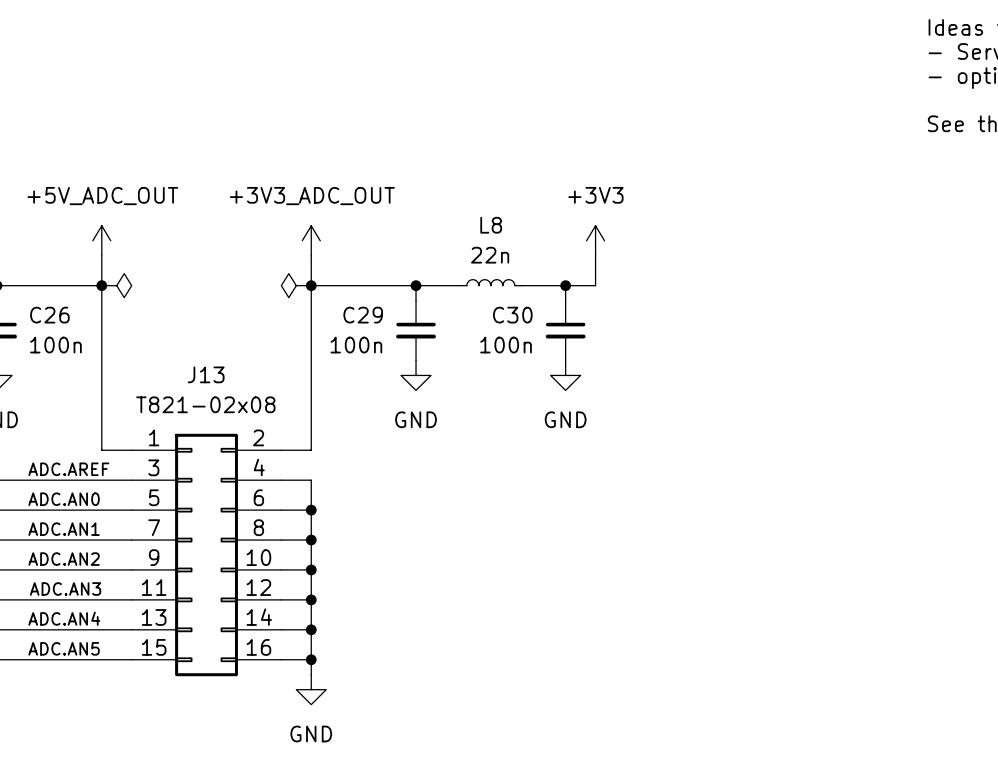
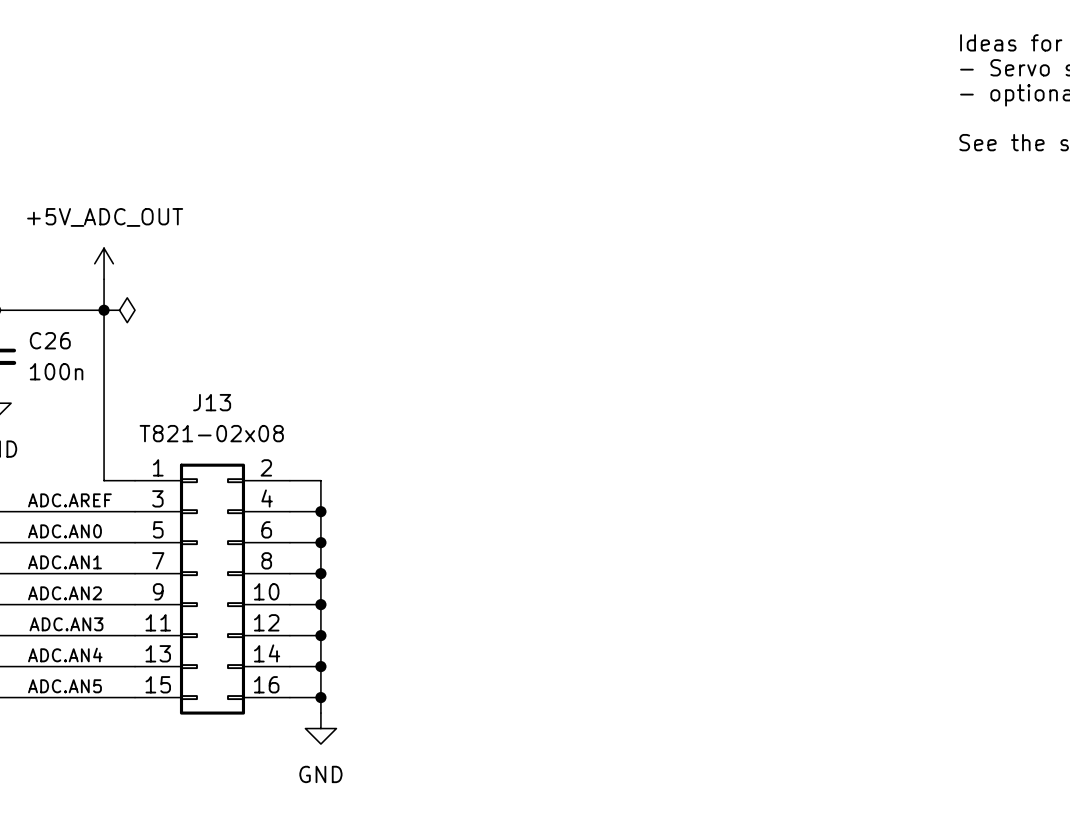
power symbol: +3V3_ADC_OUT (311, 240) -> none
power symbol: +3V3 (595, 240) -> none
wire: (311, 255) (311, 450) -> (320, 511) (320, 480)
wire: (595, 255) (595, 285) (520, 285) -> none
L8: 22n (490, 282) -> none
power symbol: (296, 285) -> none
wire: (311, 285) (460, 285) -> none
junction: (311, 285) -> none
wire: (416, 285) (416, 300) -> none
junction: (416, 285) -> none
wire: (565, 285) (565, 300) -> none
junction: (565, 285) -> none
C29: 100n (416, 330) -> none
C30: 100n (565, 330) -> none
power symbol: GND (416, 375) -> none
power symbol: GND (565, 375) -> none
junction: none -> (320, 511)

